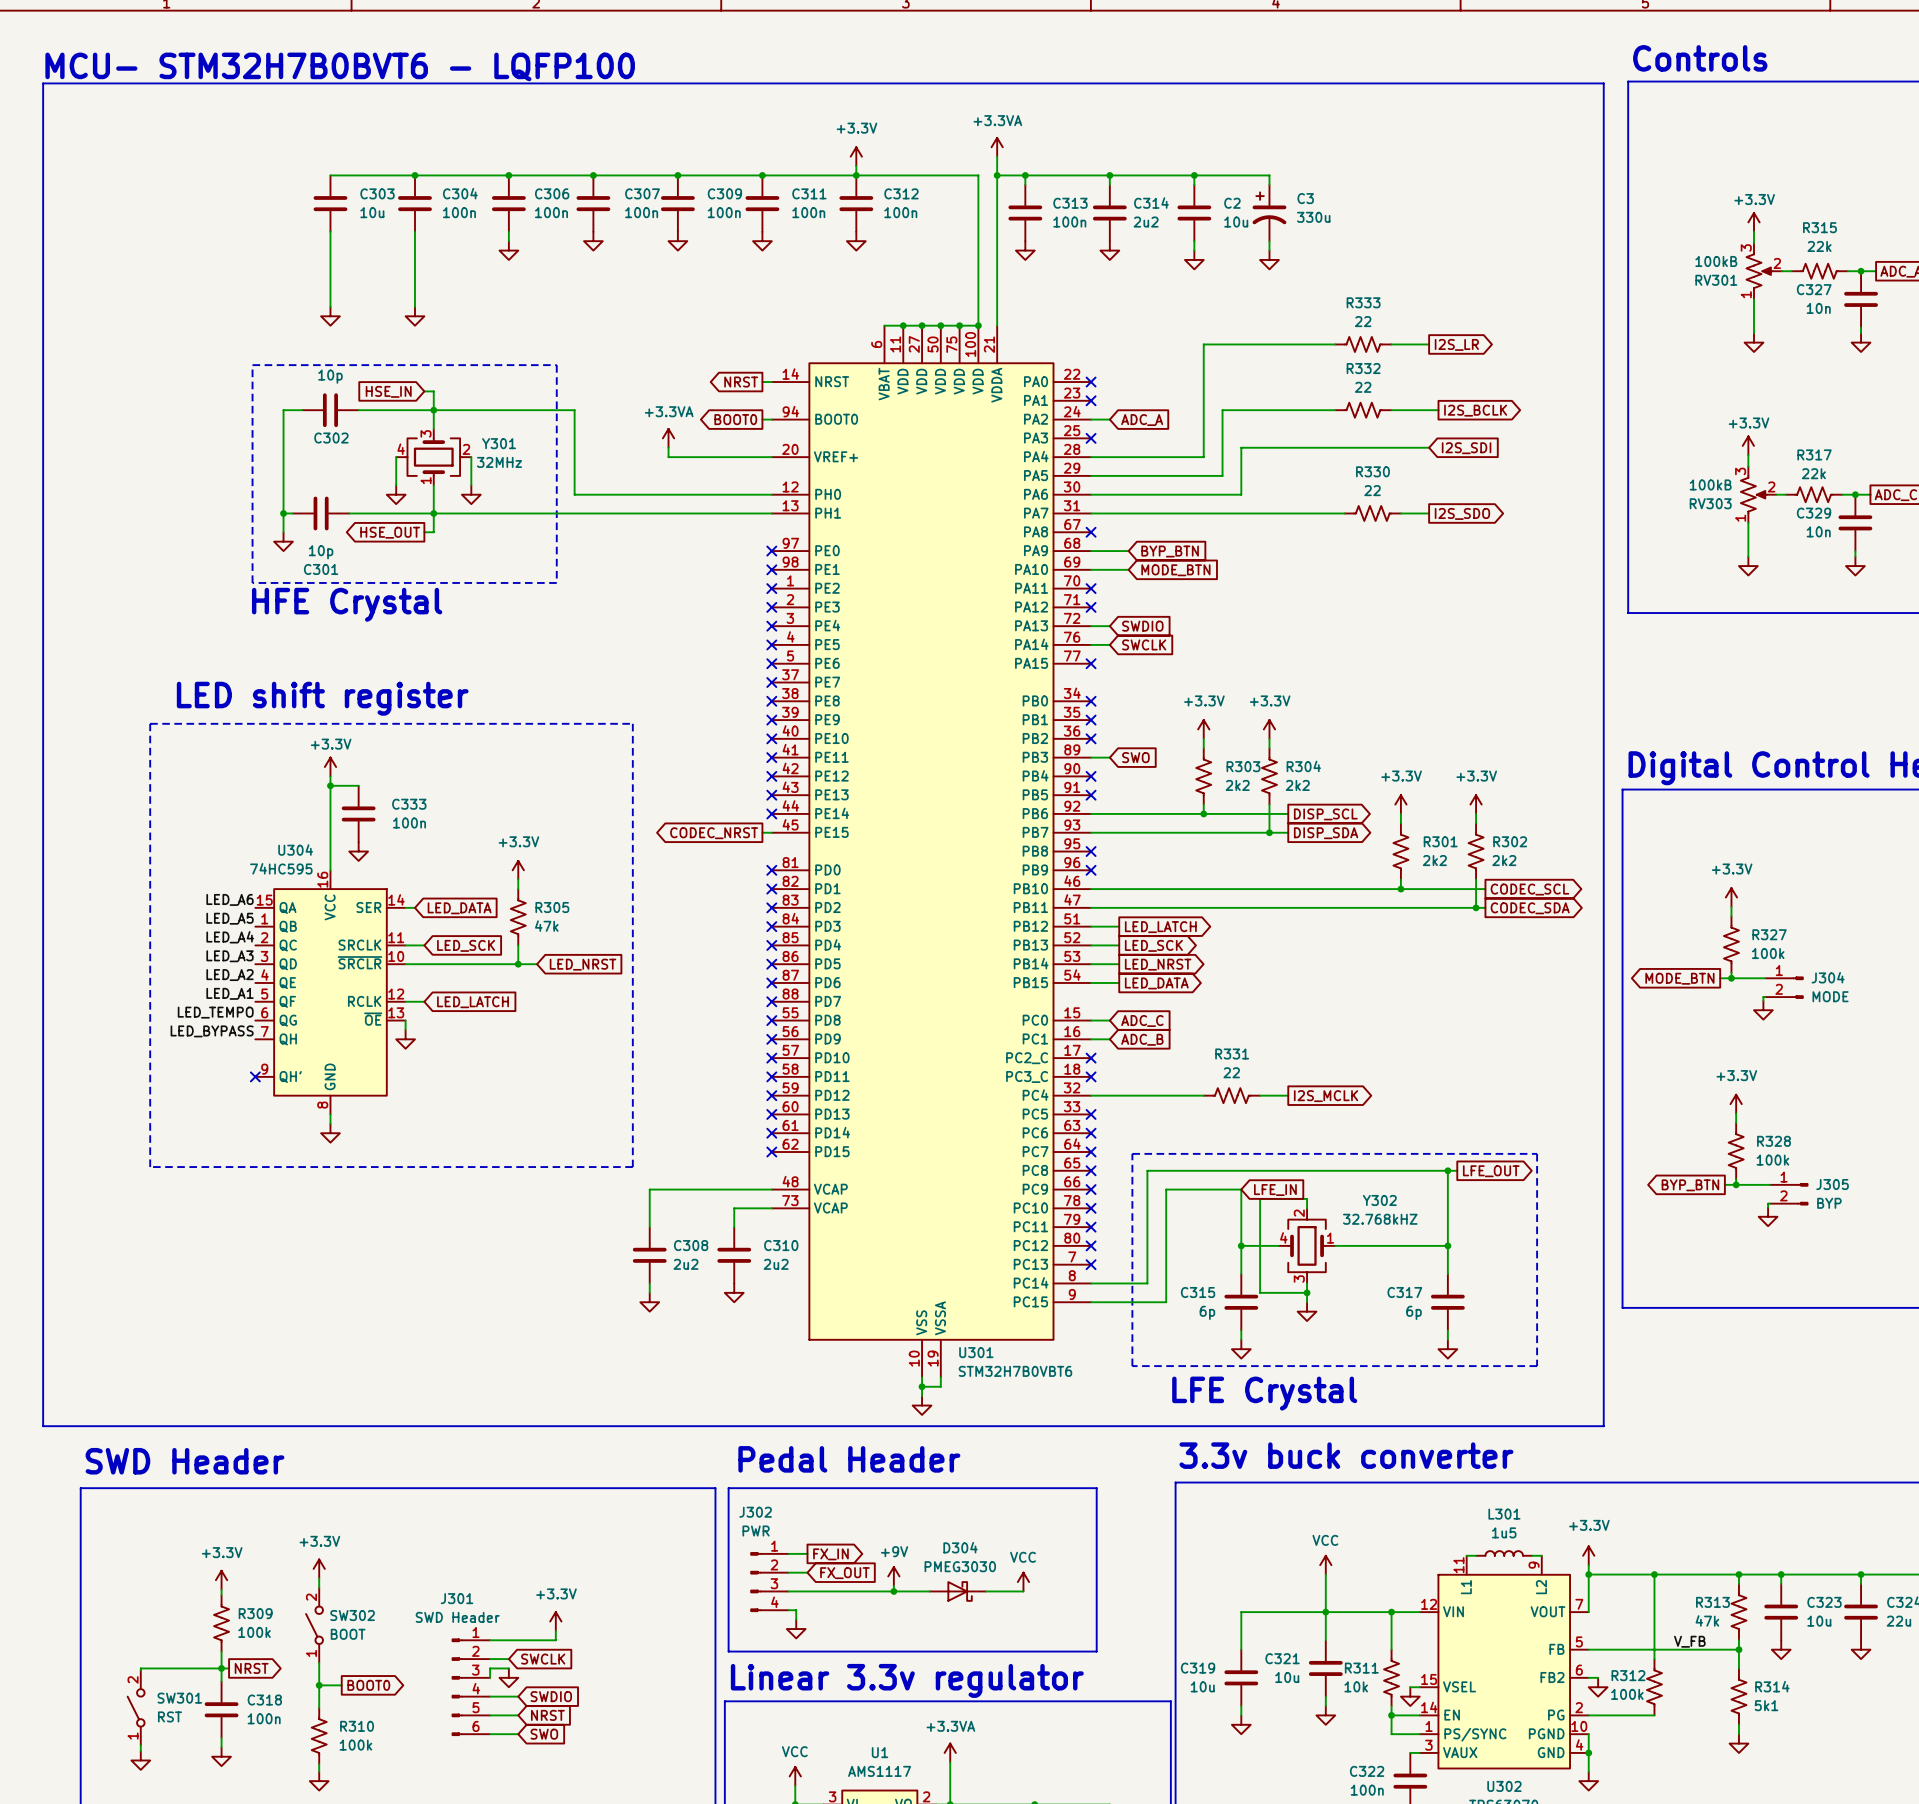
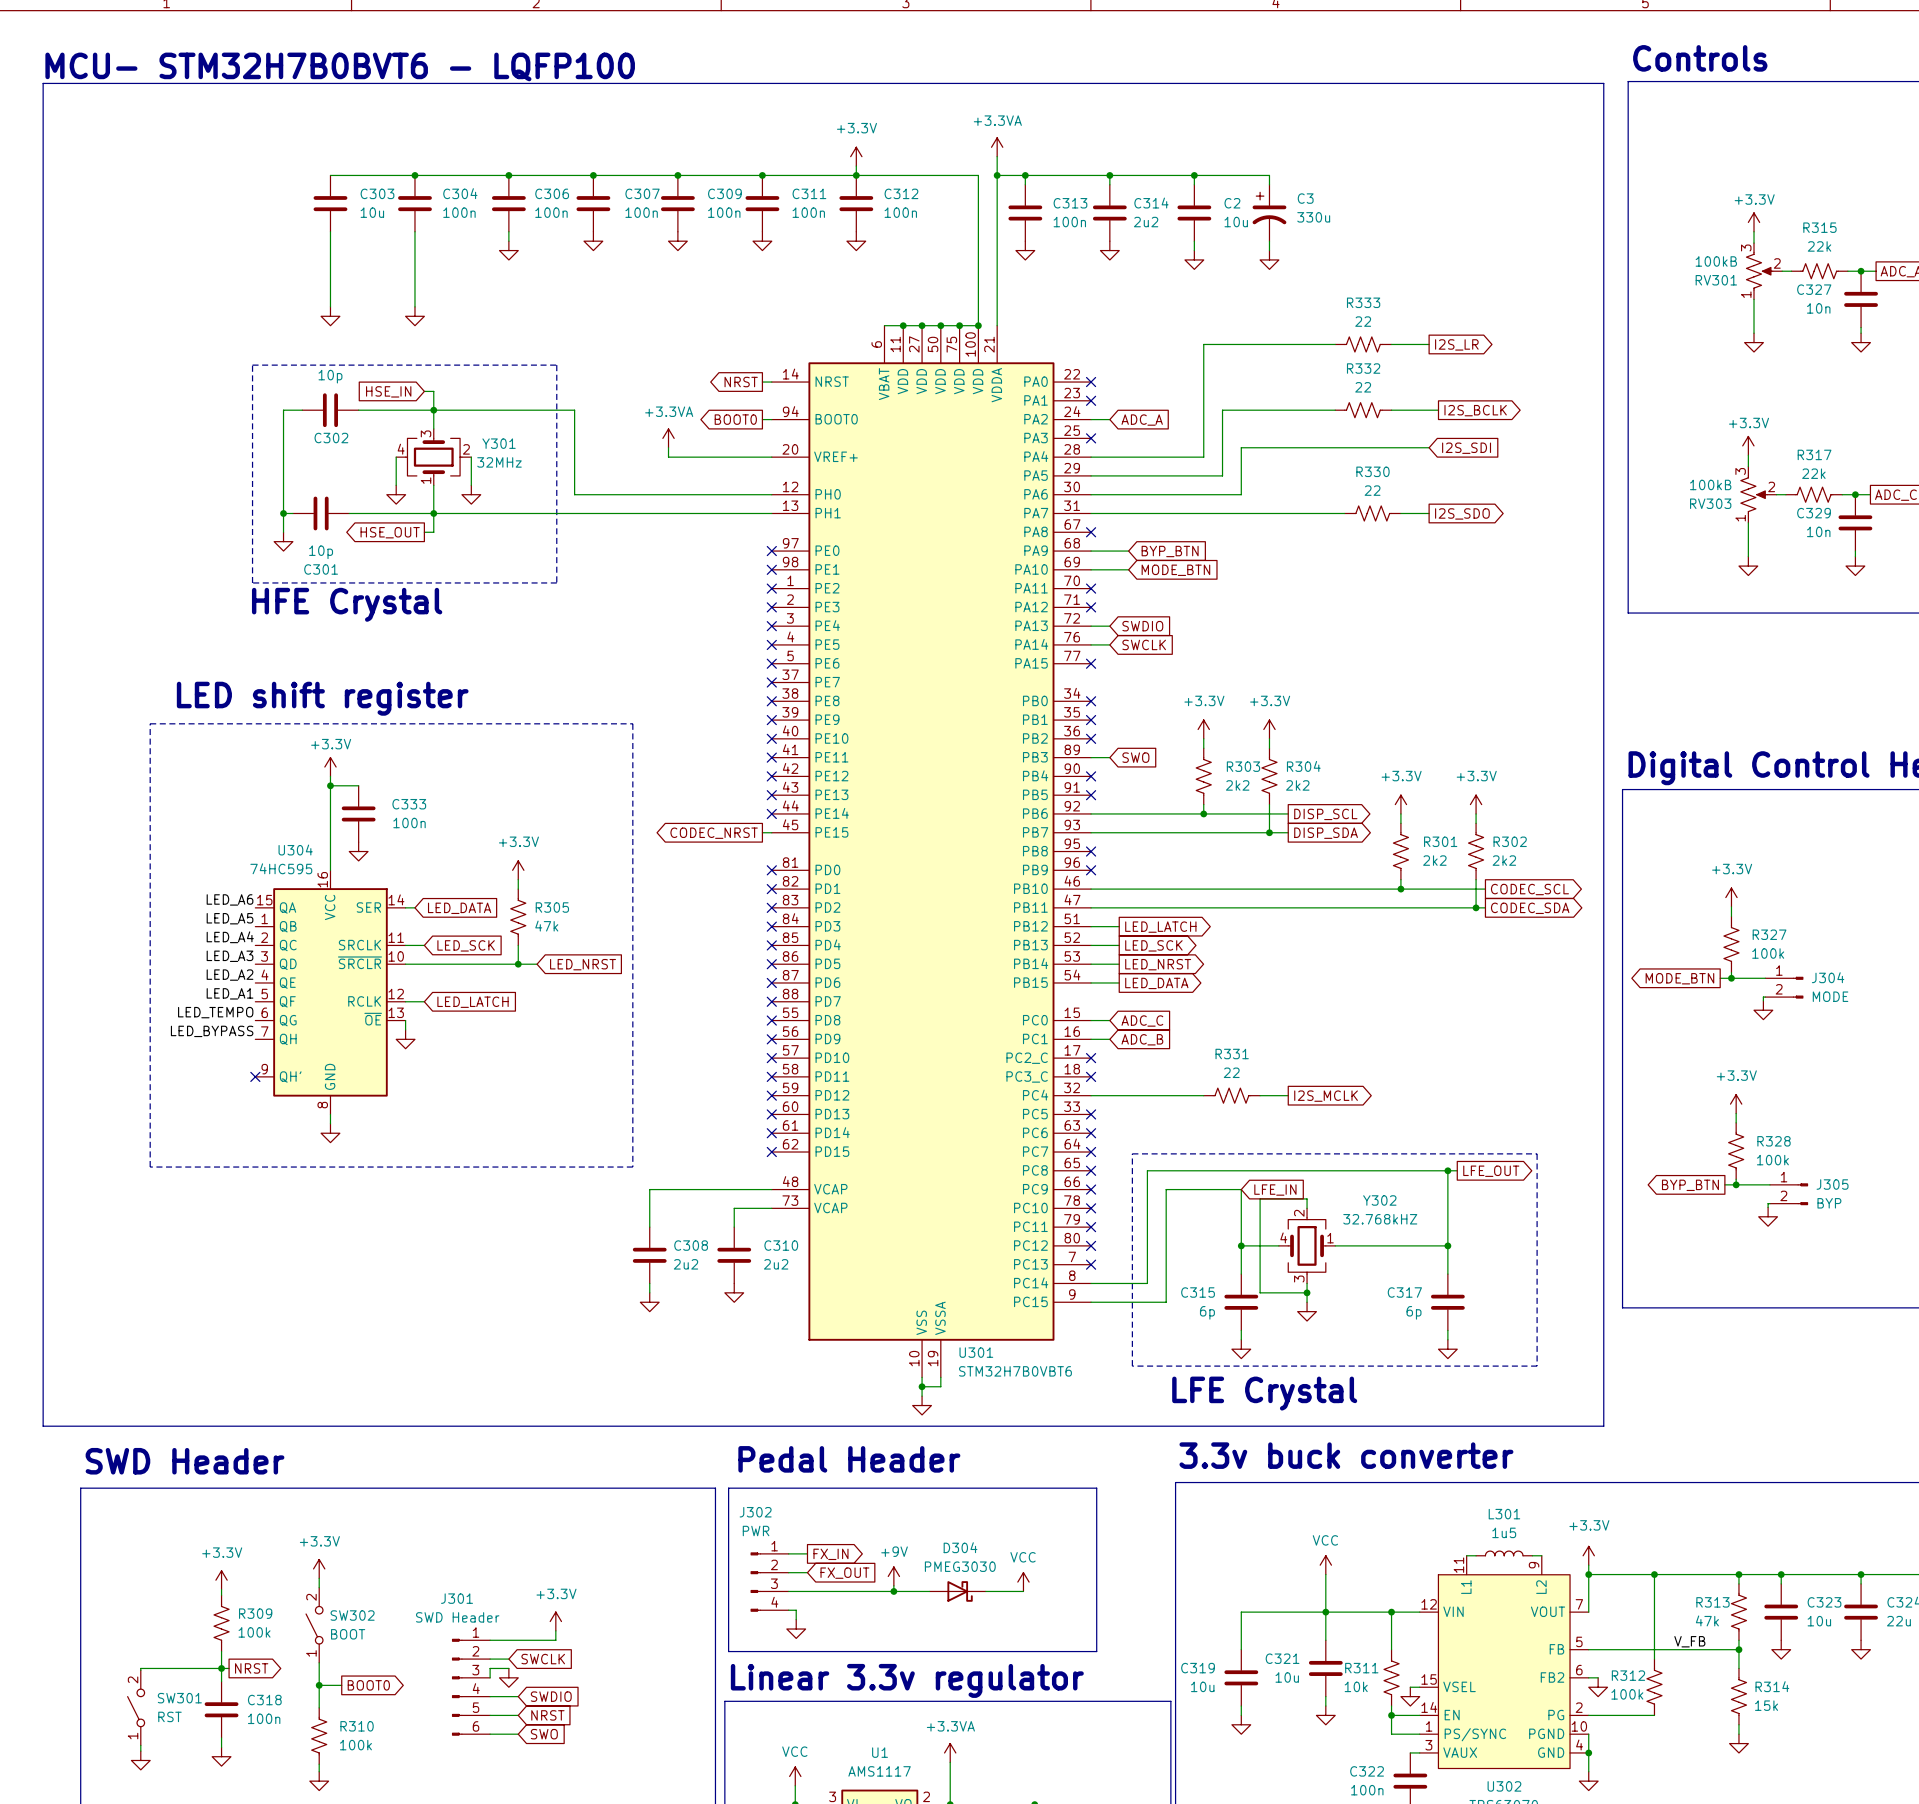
R314 value: 5k1 (1766, 1705) -> 15k (1766, 1705)

